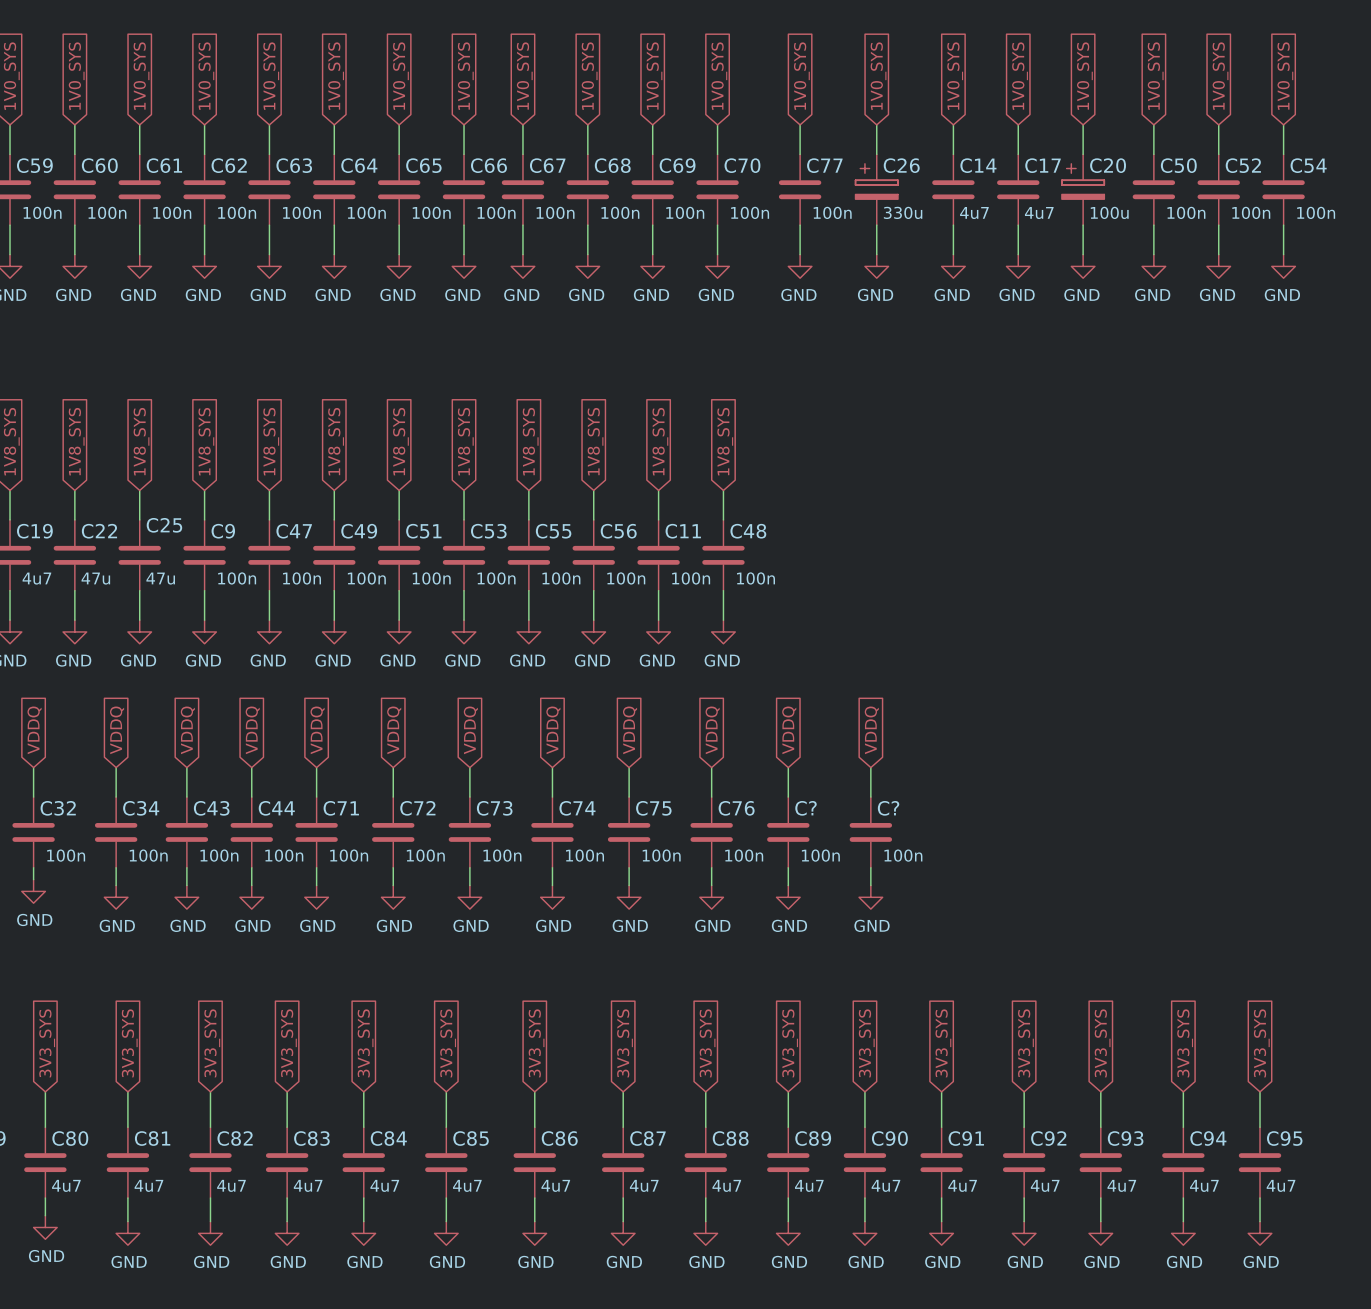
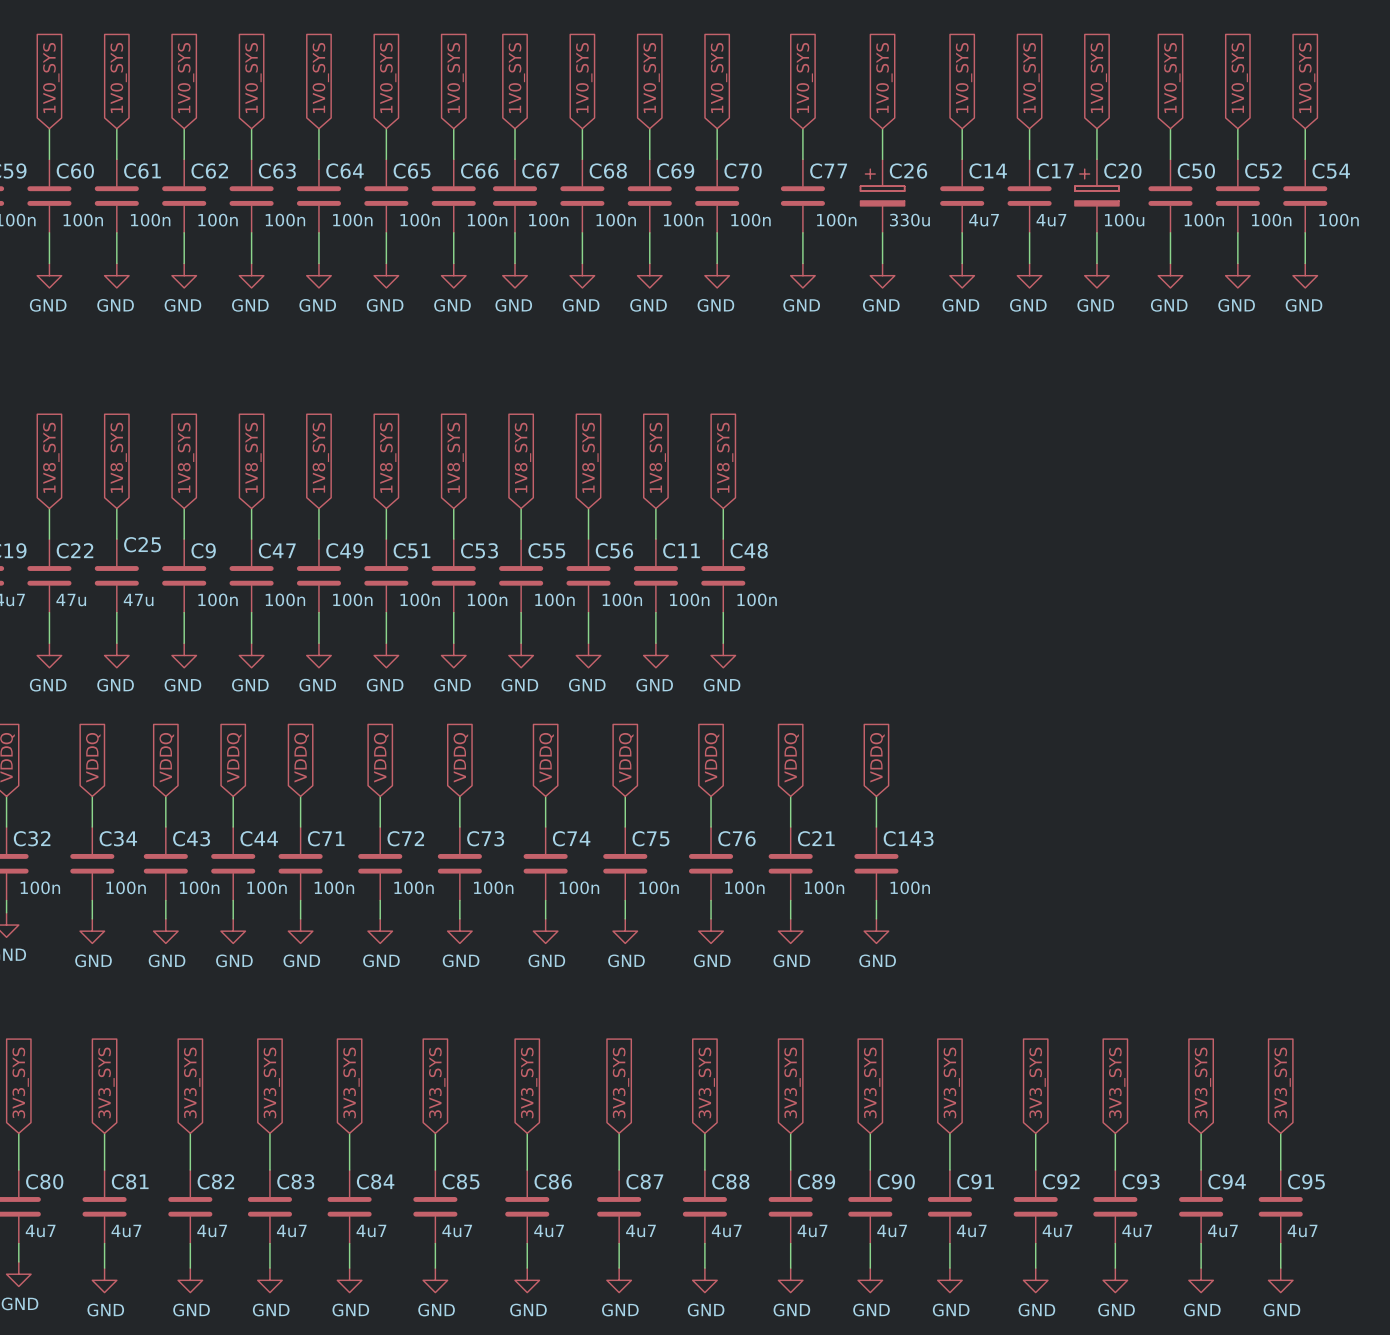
C? name: C? (806, 808) -> C21 (816, 838)
C? name: C? (888, 808) -> C143 (908, 838)

